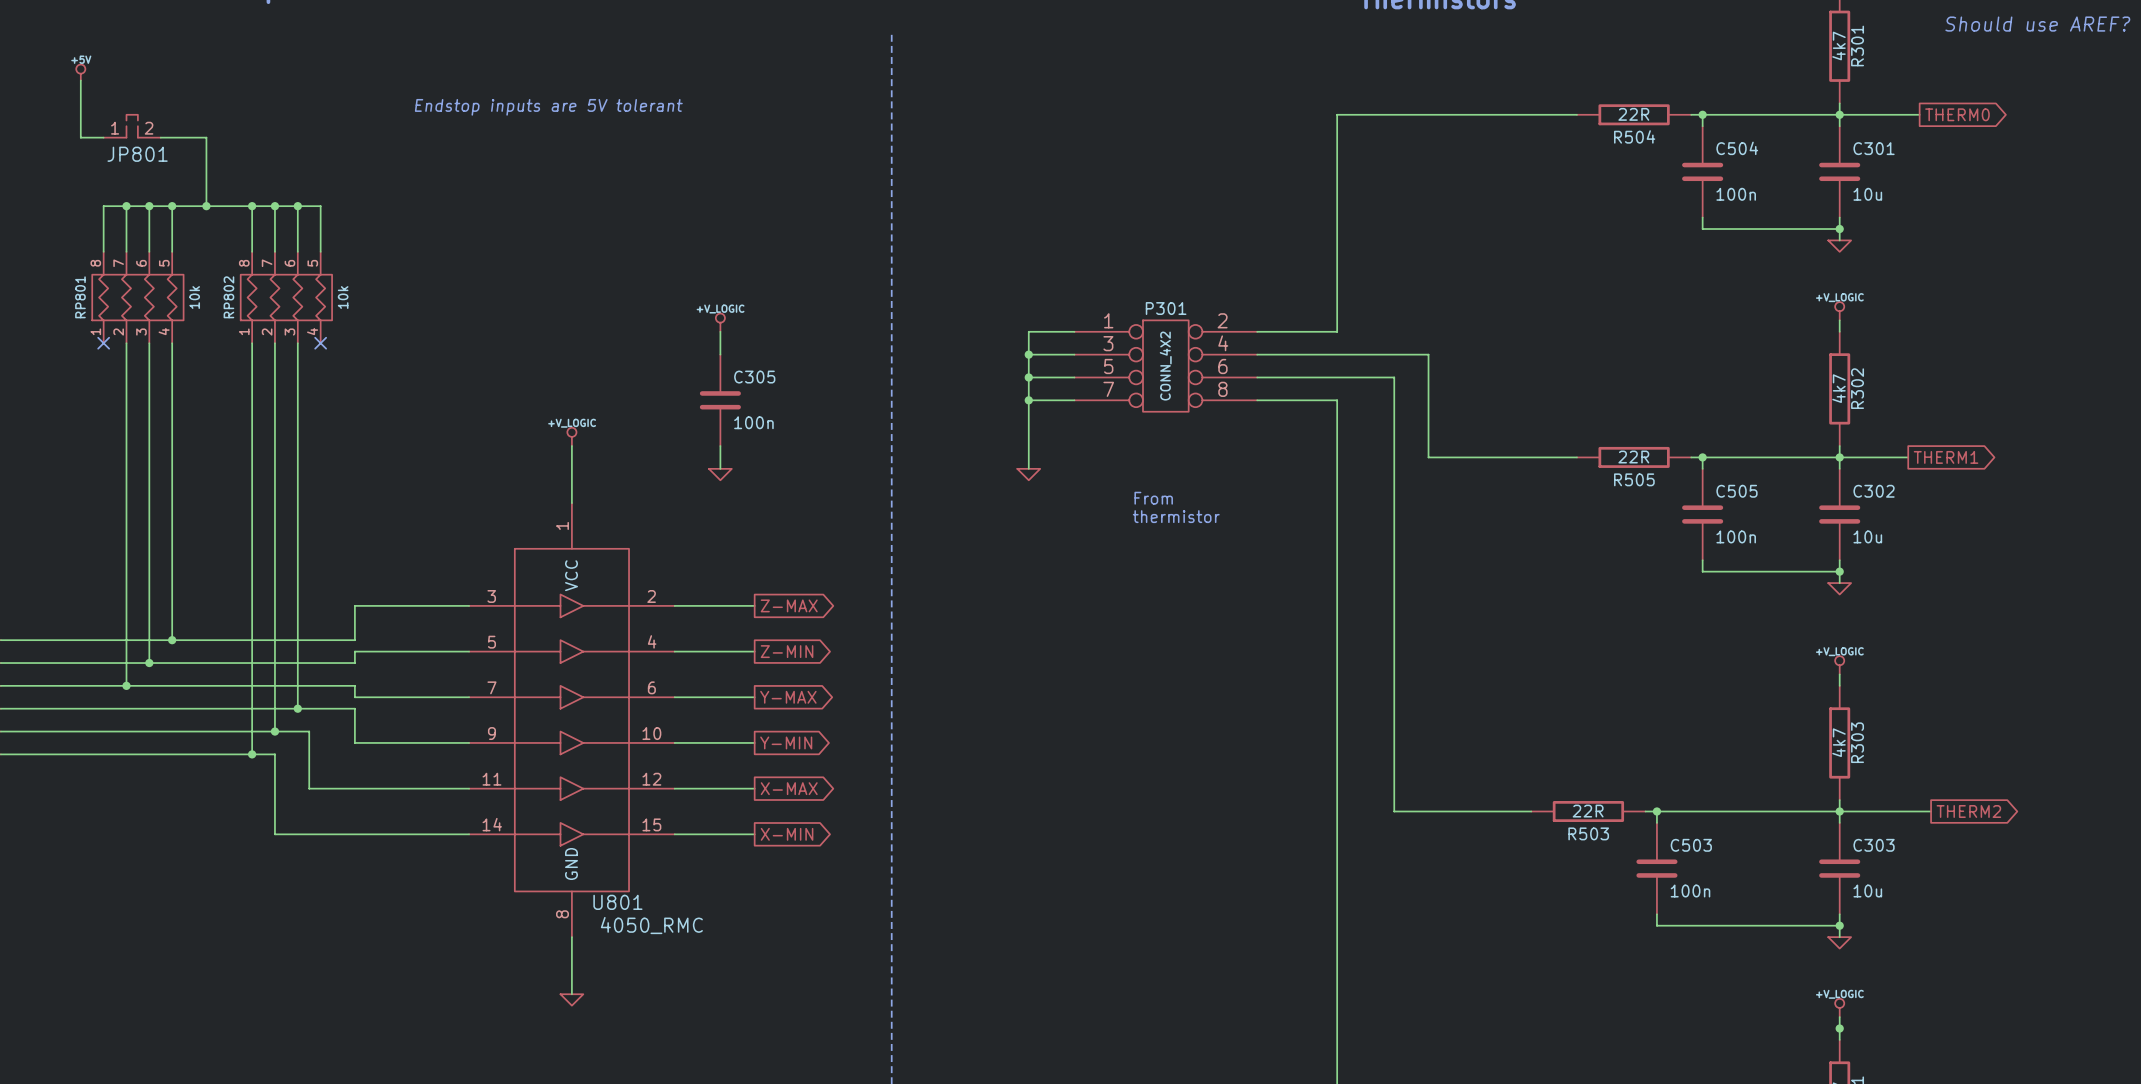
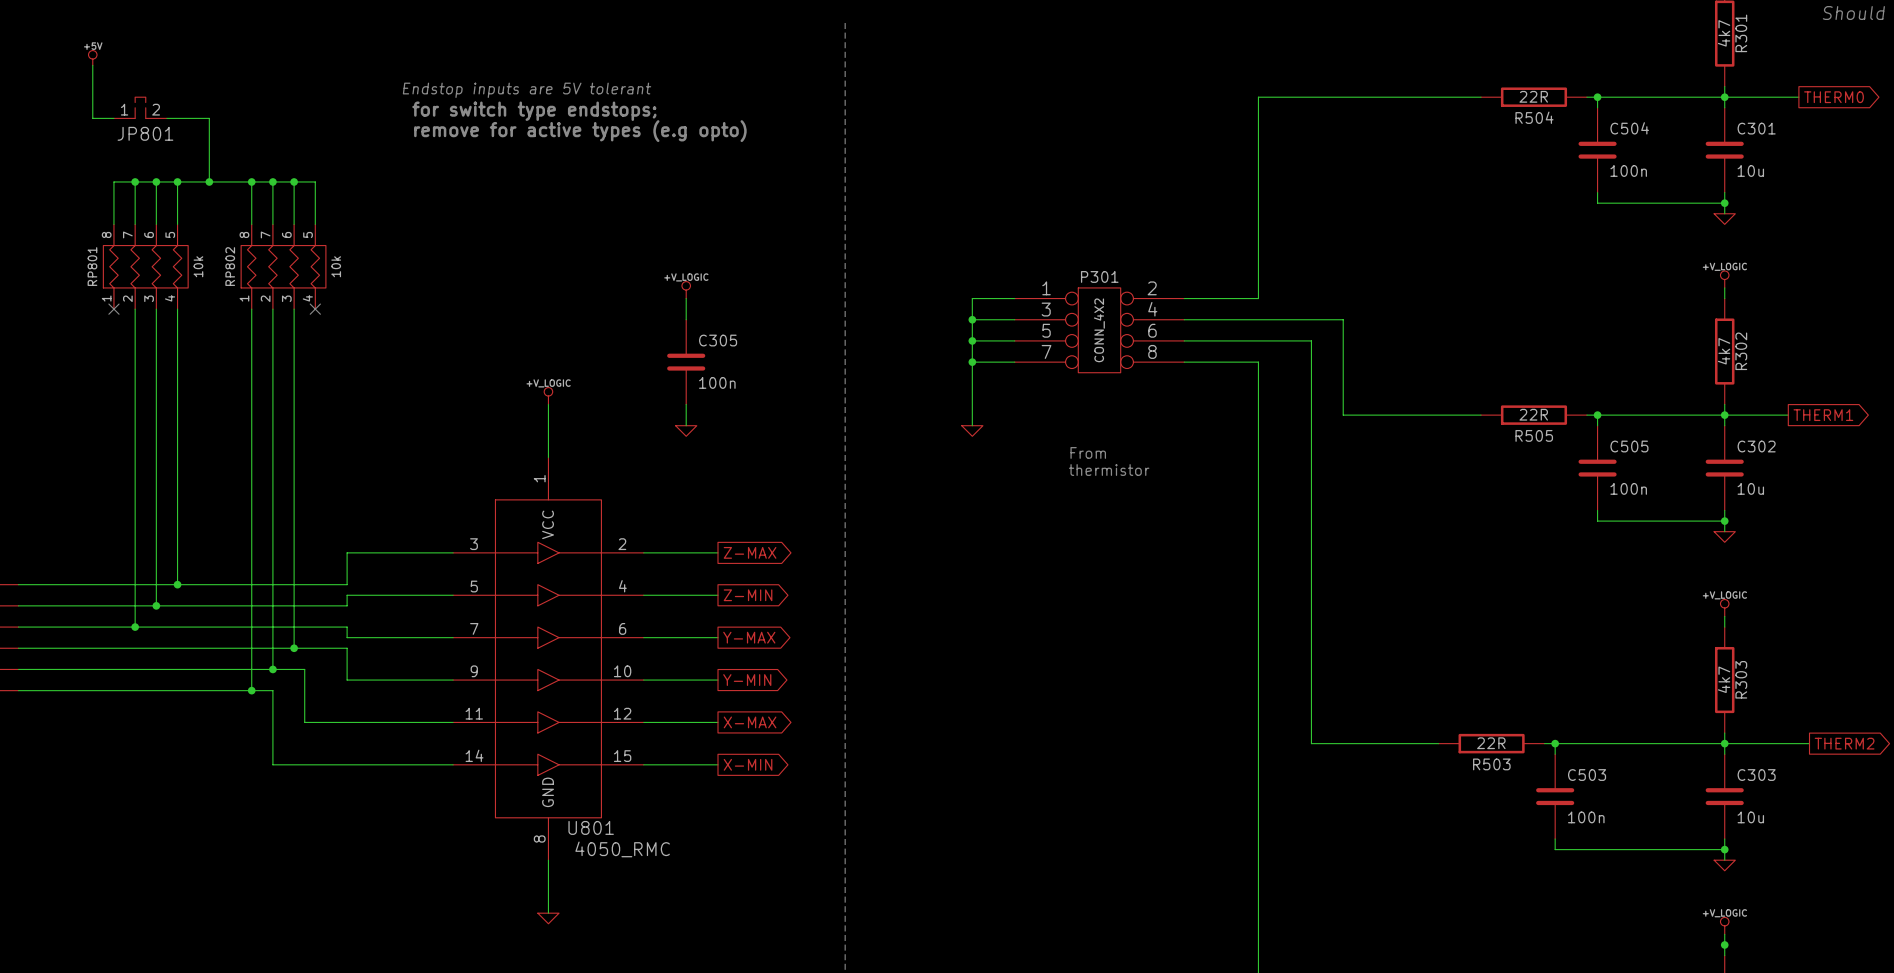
text: none -> for switch type endstops; (534, 111)
text: none -> remove for active types (e.g opto) (580, 131)

